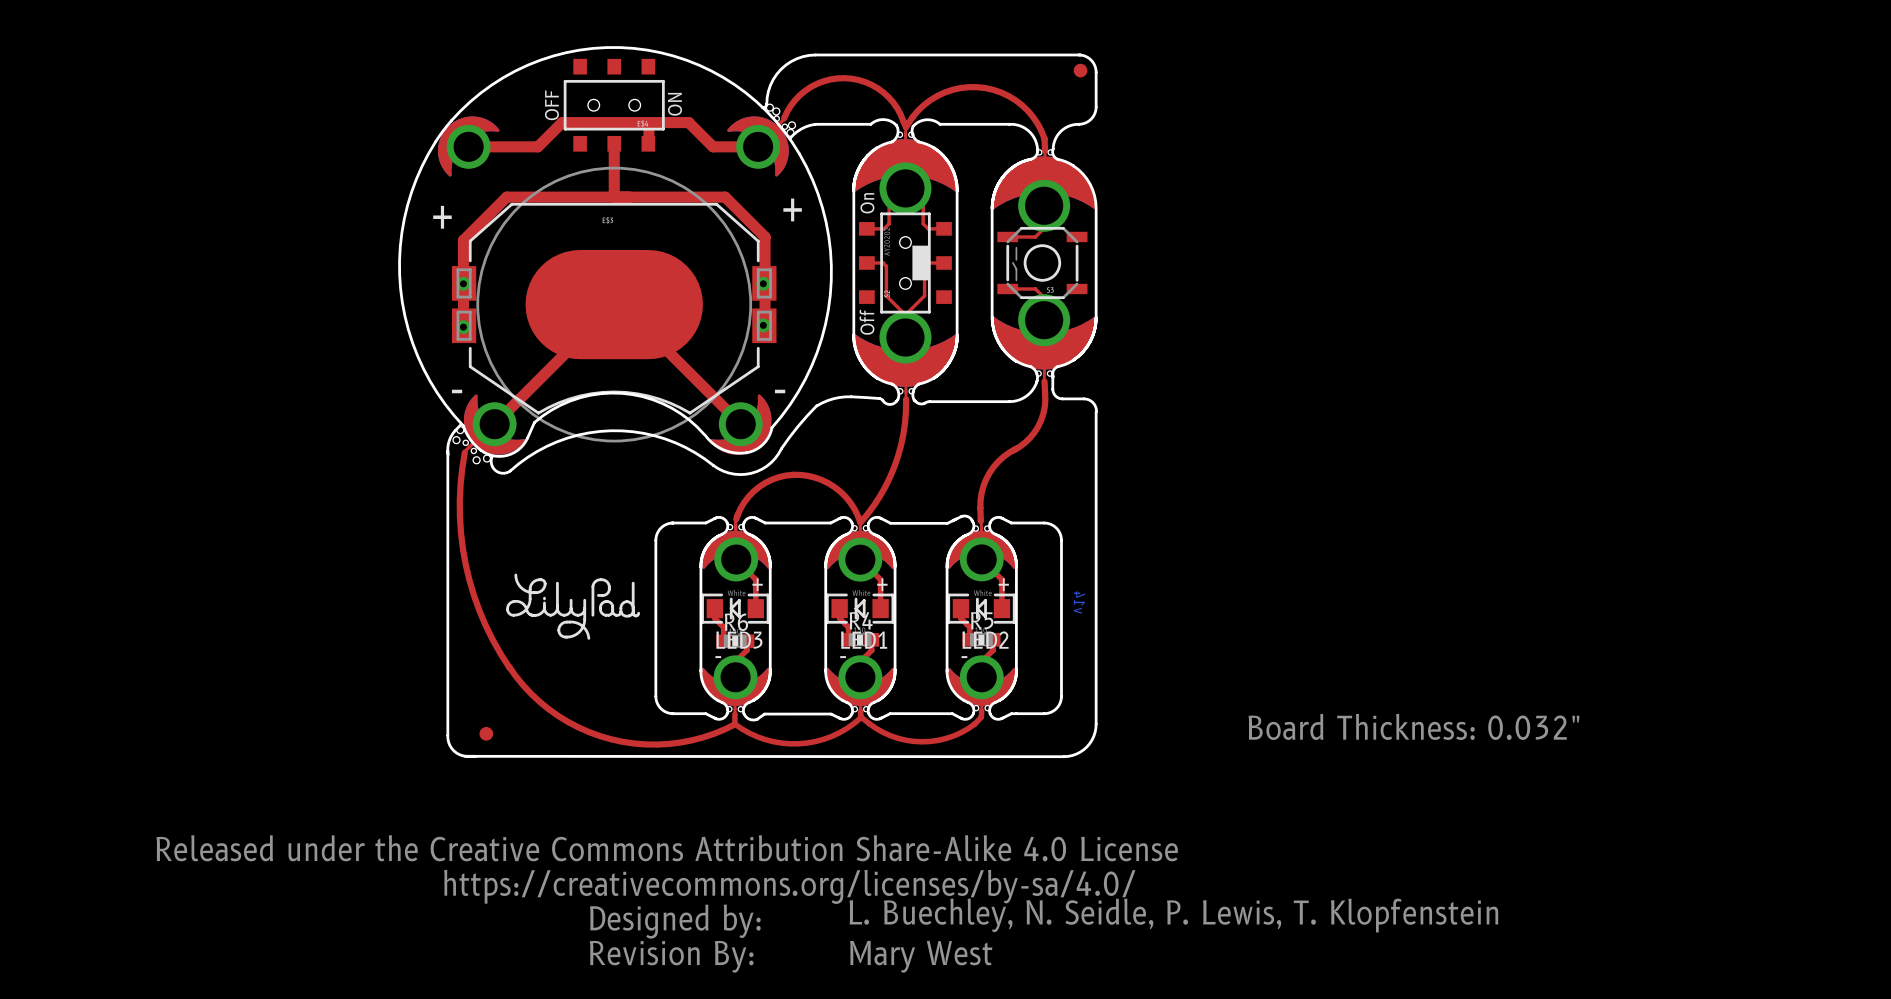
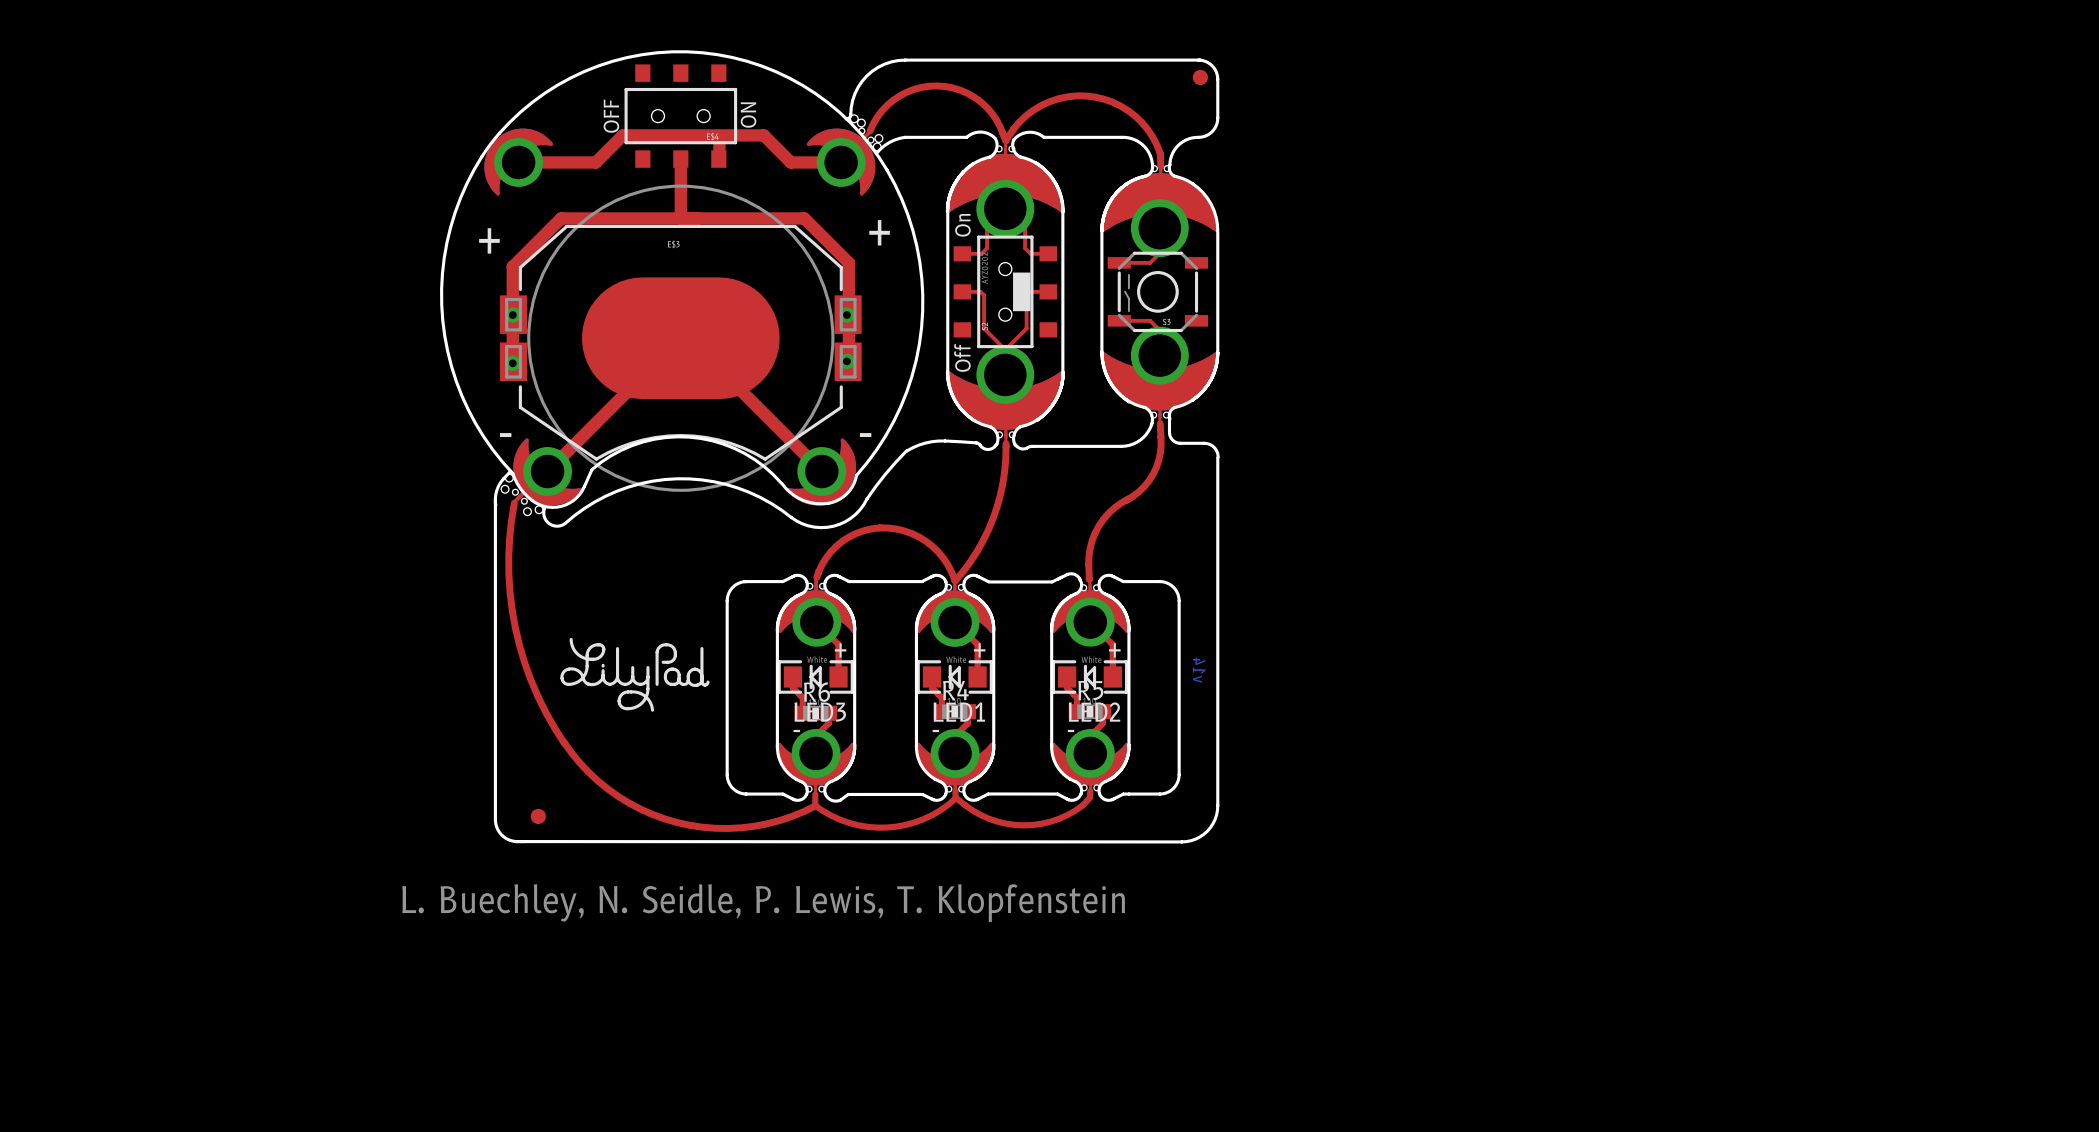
text: Board Thickness: 0.032" (1413, 726) -> none
text: none -> L. Buechley, N. Seidle, P. Lewis, T. Klopfenstein (763, 903)
drawing: [156, 835, 1178, 973] -> none
text: L. Buechley, N. Seidle, P. Lewis, T. Klopfenstein (1173, 915) -> none
text: Mary West (921, 956) -> none

